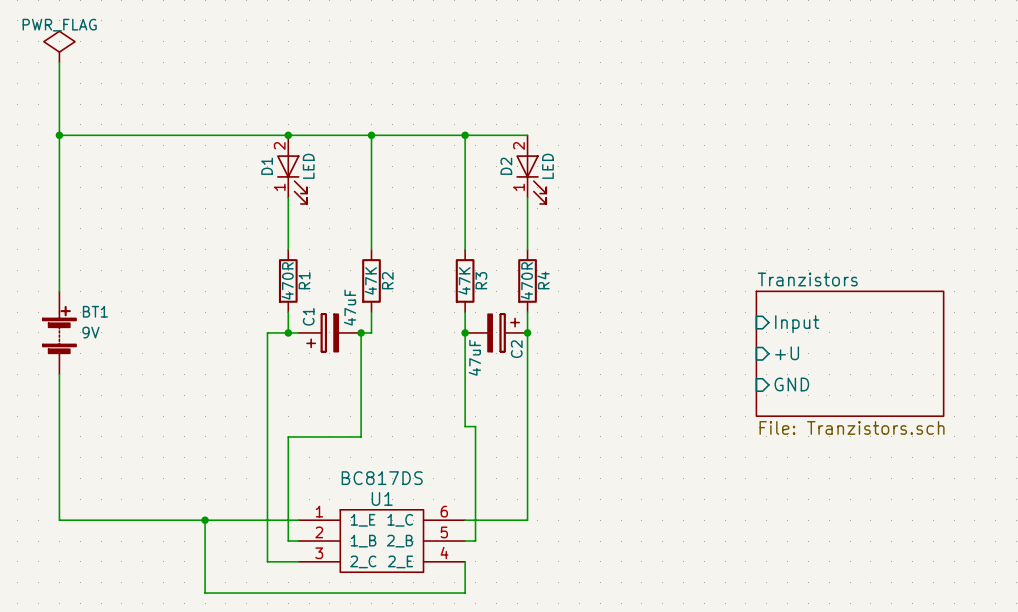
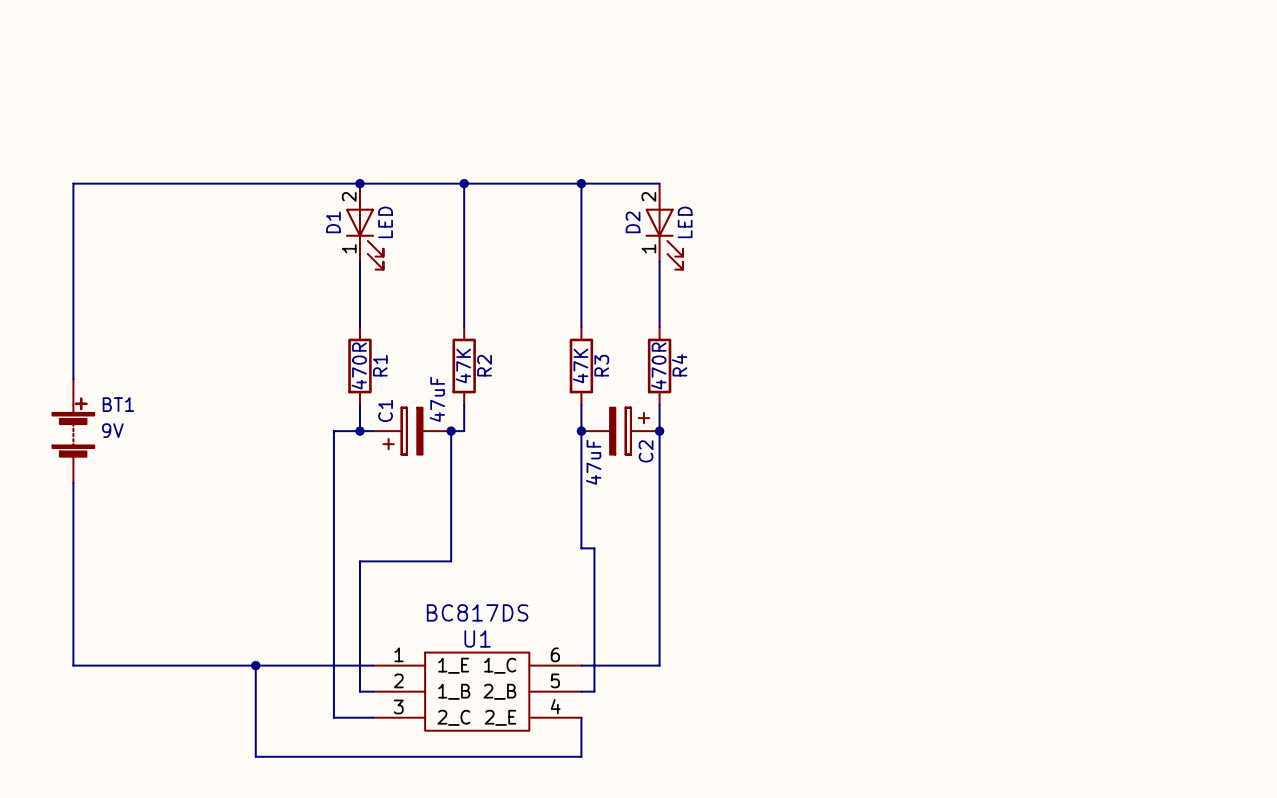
power symbol: PWR_FLAG (59, 46) -> none
wire: (59, 62) (59, 135) -> none
junction: (59, 135) -> none
sheet pin: Input (797, 324) -> none
sheet pin: +U (787, 353) -> none
sheet Tranzistors: File: Tranzistors.sch (850, 353) -> none
sheet pin: GND (791, 384) -> none

